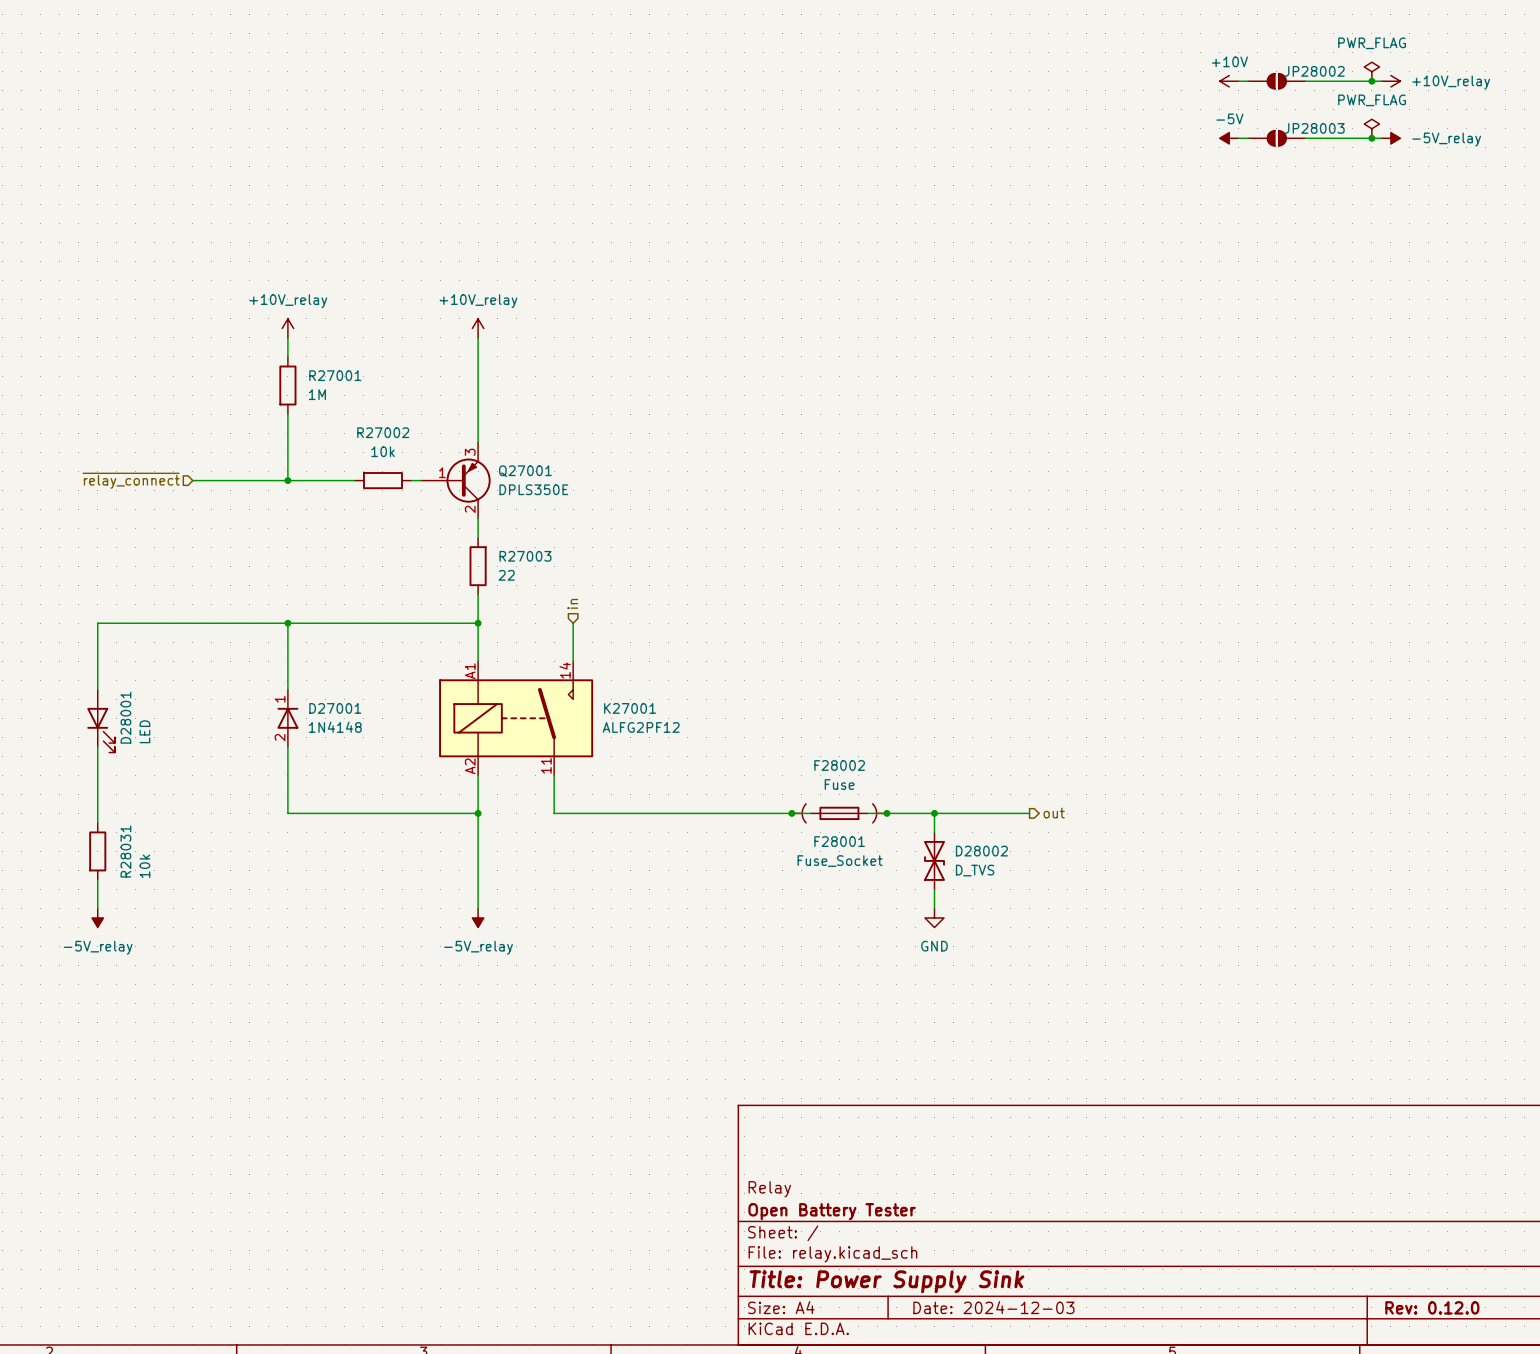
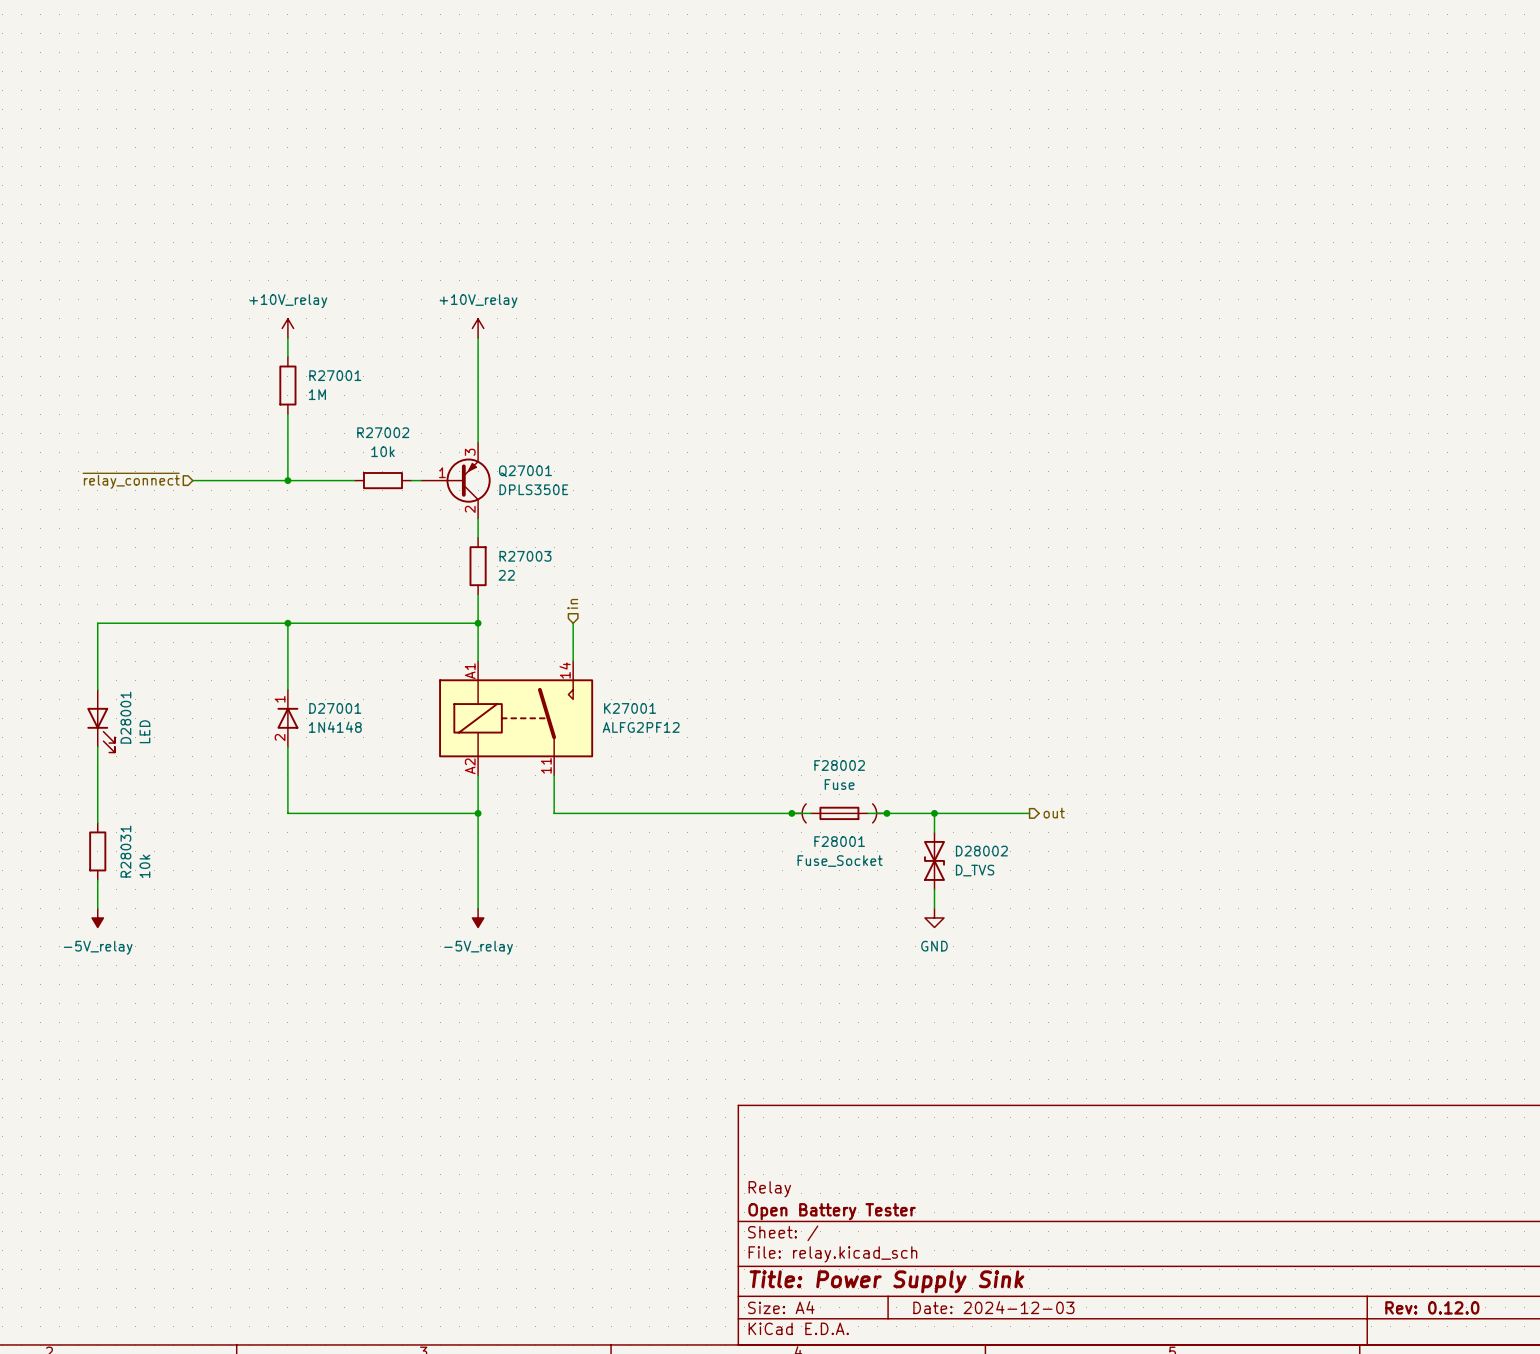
power symbol: PWR_FLAG (1371, 71) -> none
power symbol: +10V (1229, 81) -> none
wire: (1238, 81) (1248, 81) -> none
JP28002: (1276, 81) -> none
wire: (1305, 81) (1381, 81) -> none
junction: (1371, 81) -> none
power symbol: +10V_relay (1390, 81) -> none
power symbol: PWR_FLAG (1371, 128) -> none
power symbol: -5V (1229, 138) -> none
wire: (1238, 138) (1248, 138) -> none
JP28003: (1276, 138) -> none
wire: (1305, 138) (1381, 138) -> none
junction: (1371, 138) -> none
power symbol: -5V_relay (1390, 138) -> none

